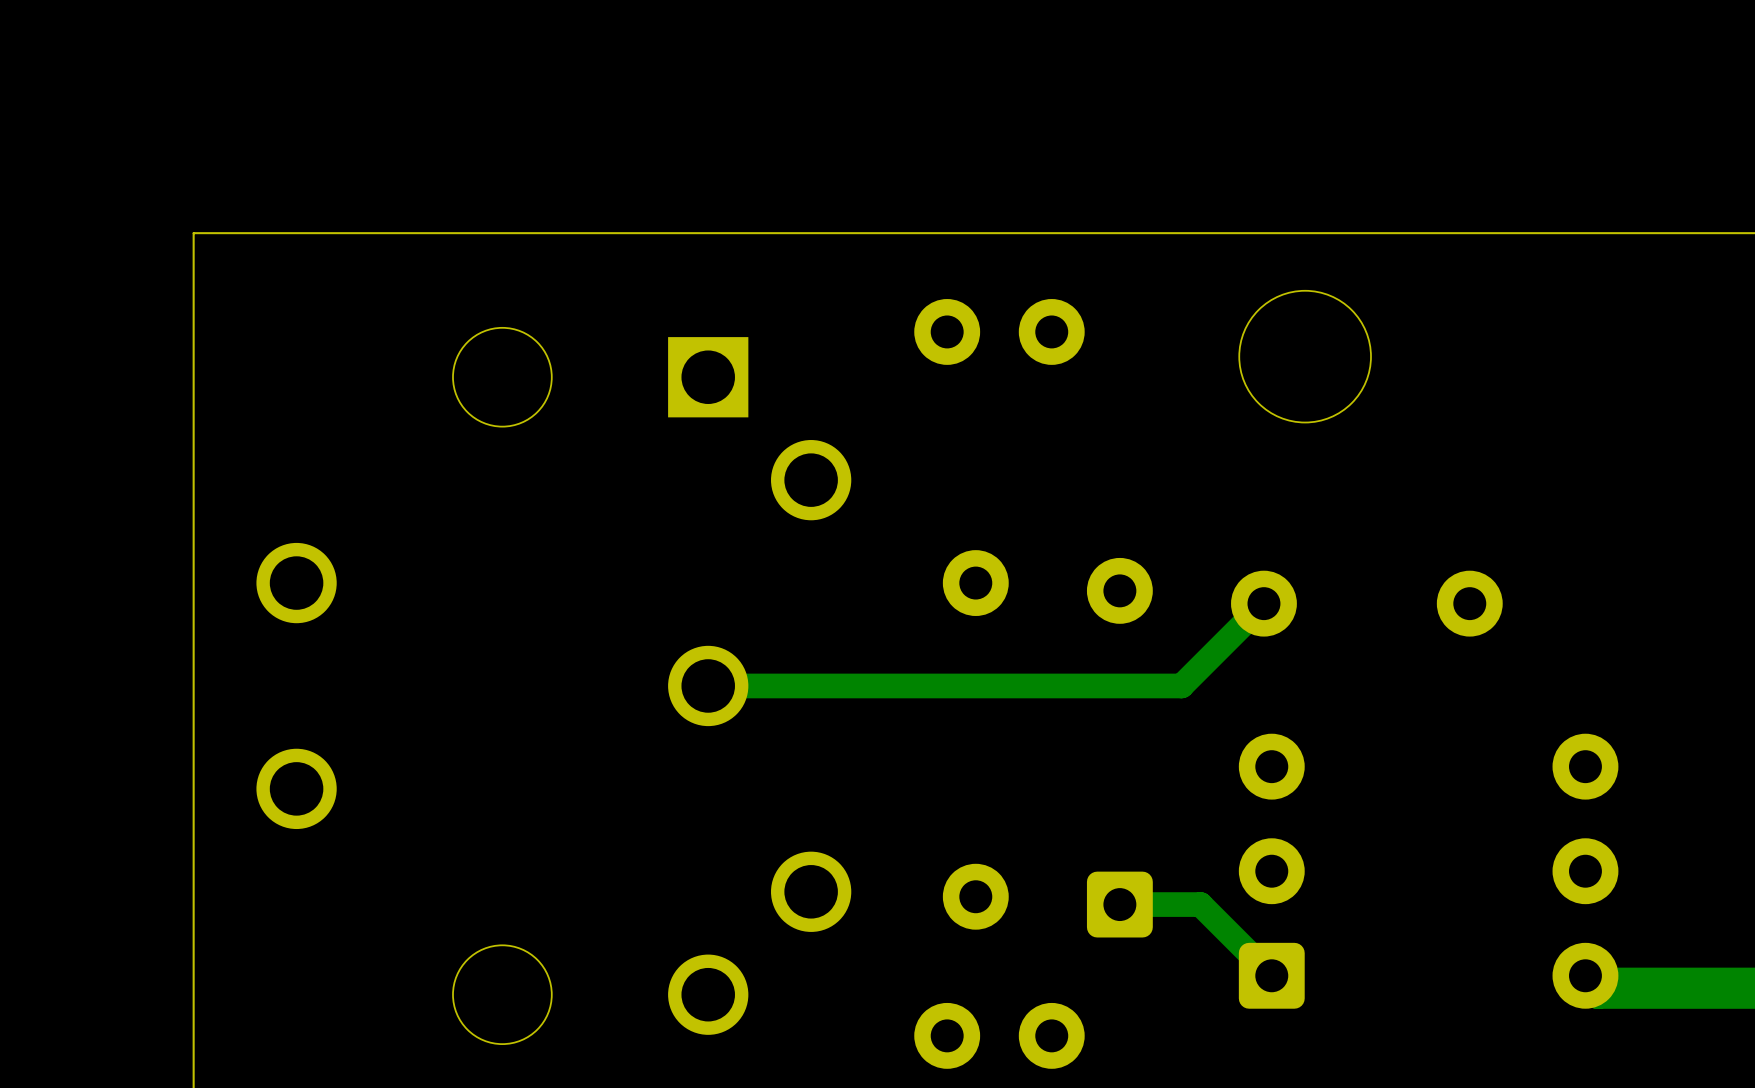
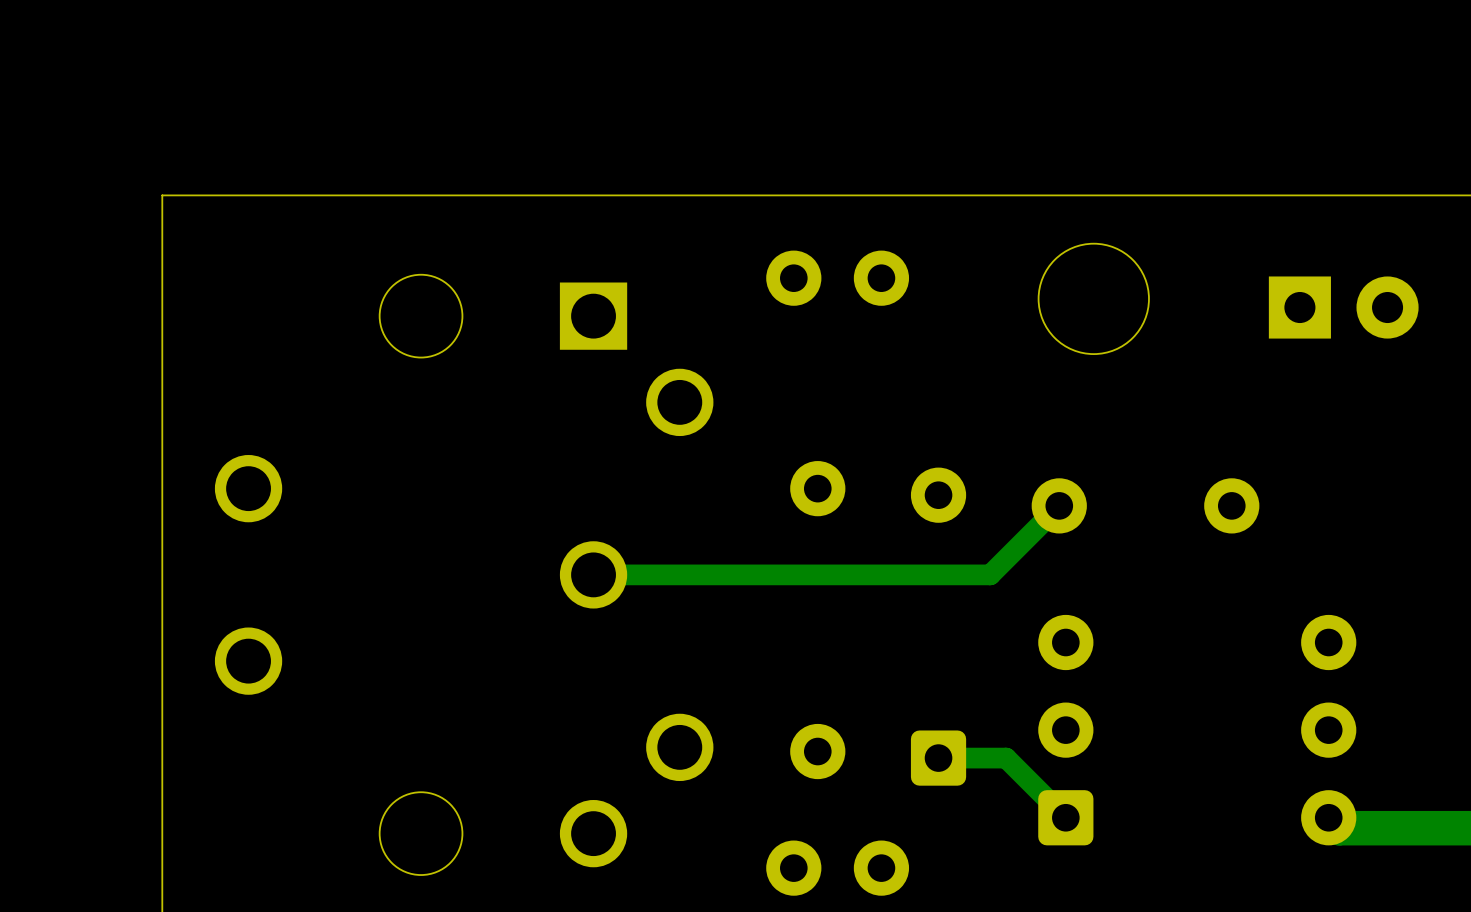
part: none -> (1343, 307)

